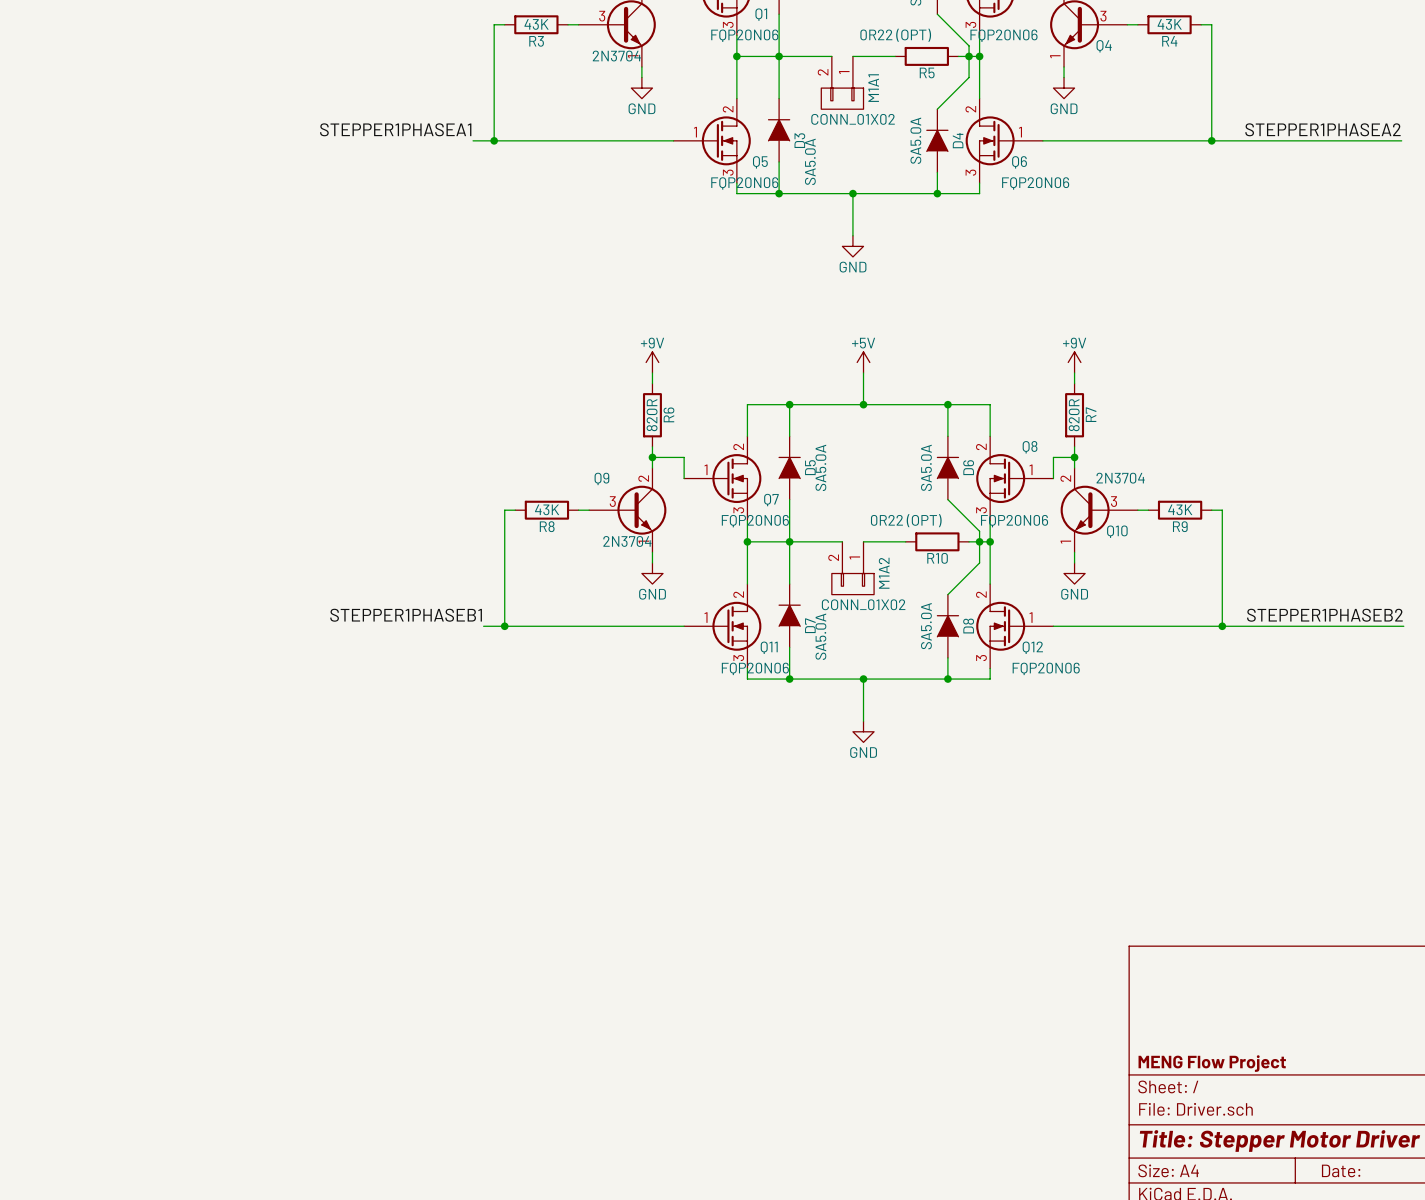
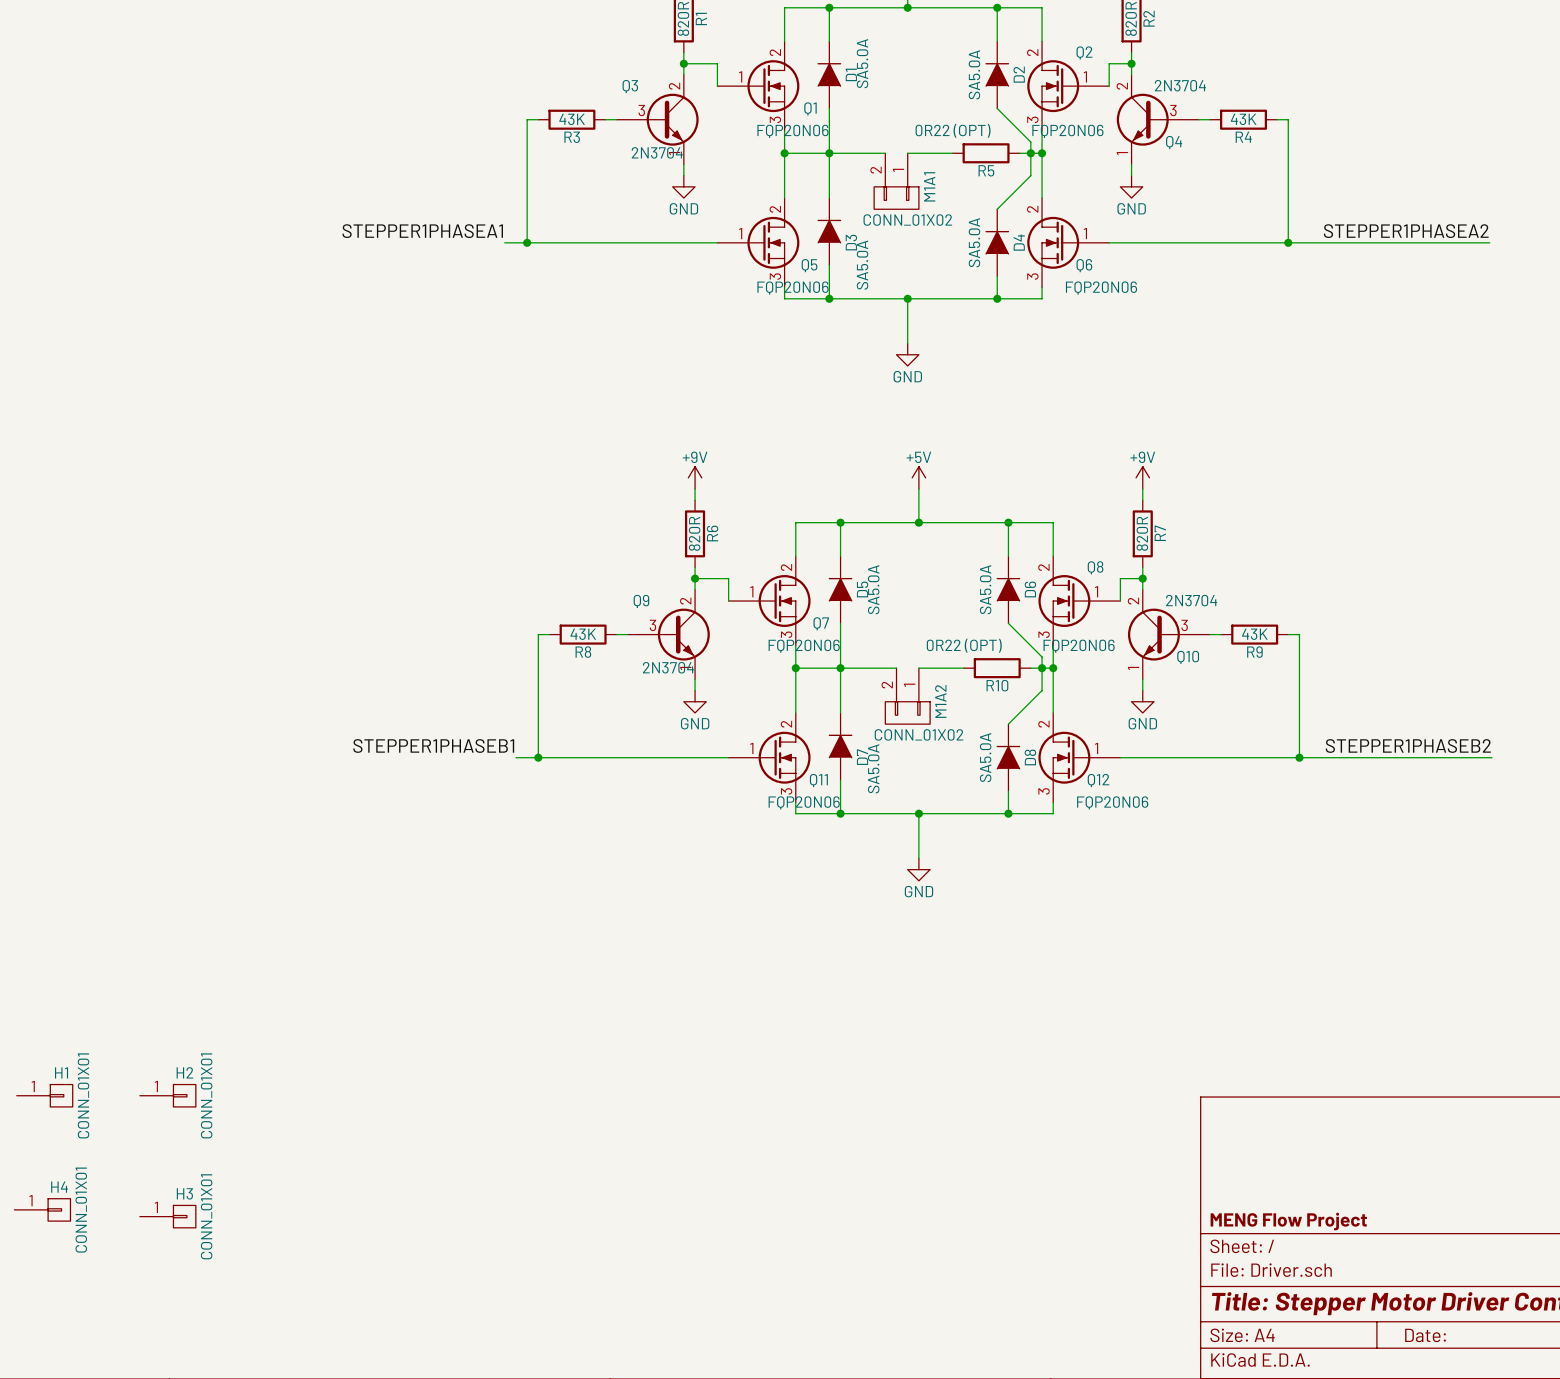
H1: none -> CONN_01X01 (44, 1095)
H2: none -> CONN_01X01 (167, 1095)
H4: none -> CONN_01X01 (42, 1209)
H3: none -> CONN_01X01 (167, 1216)

